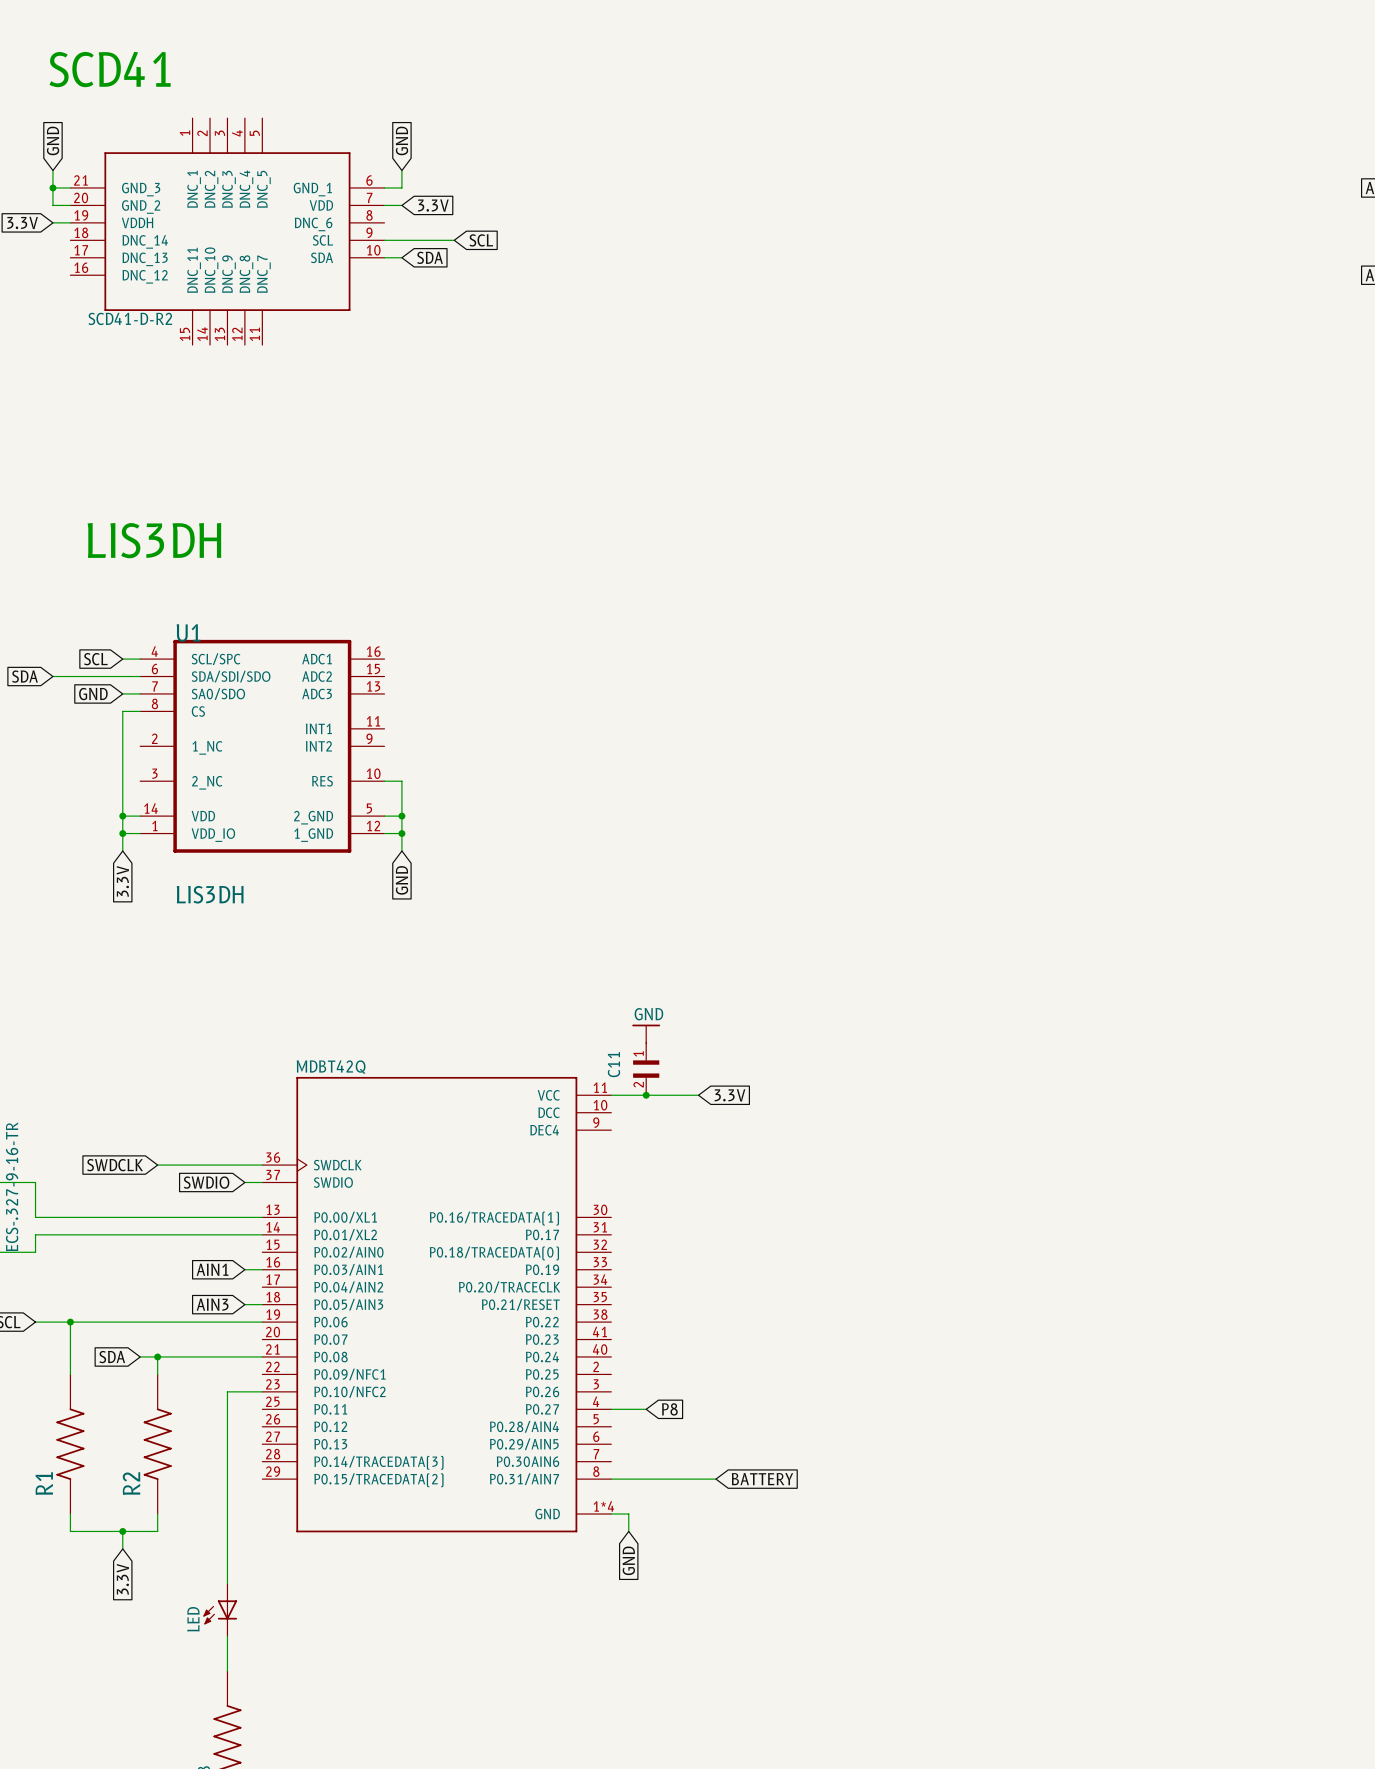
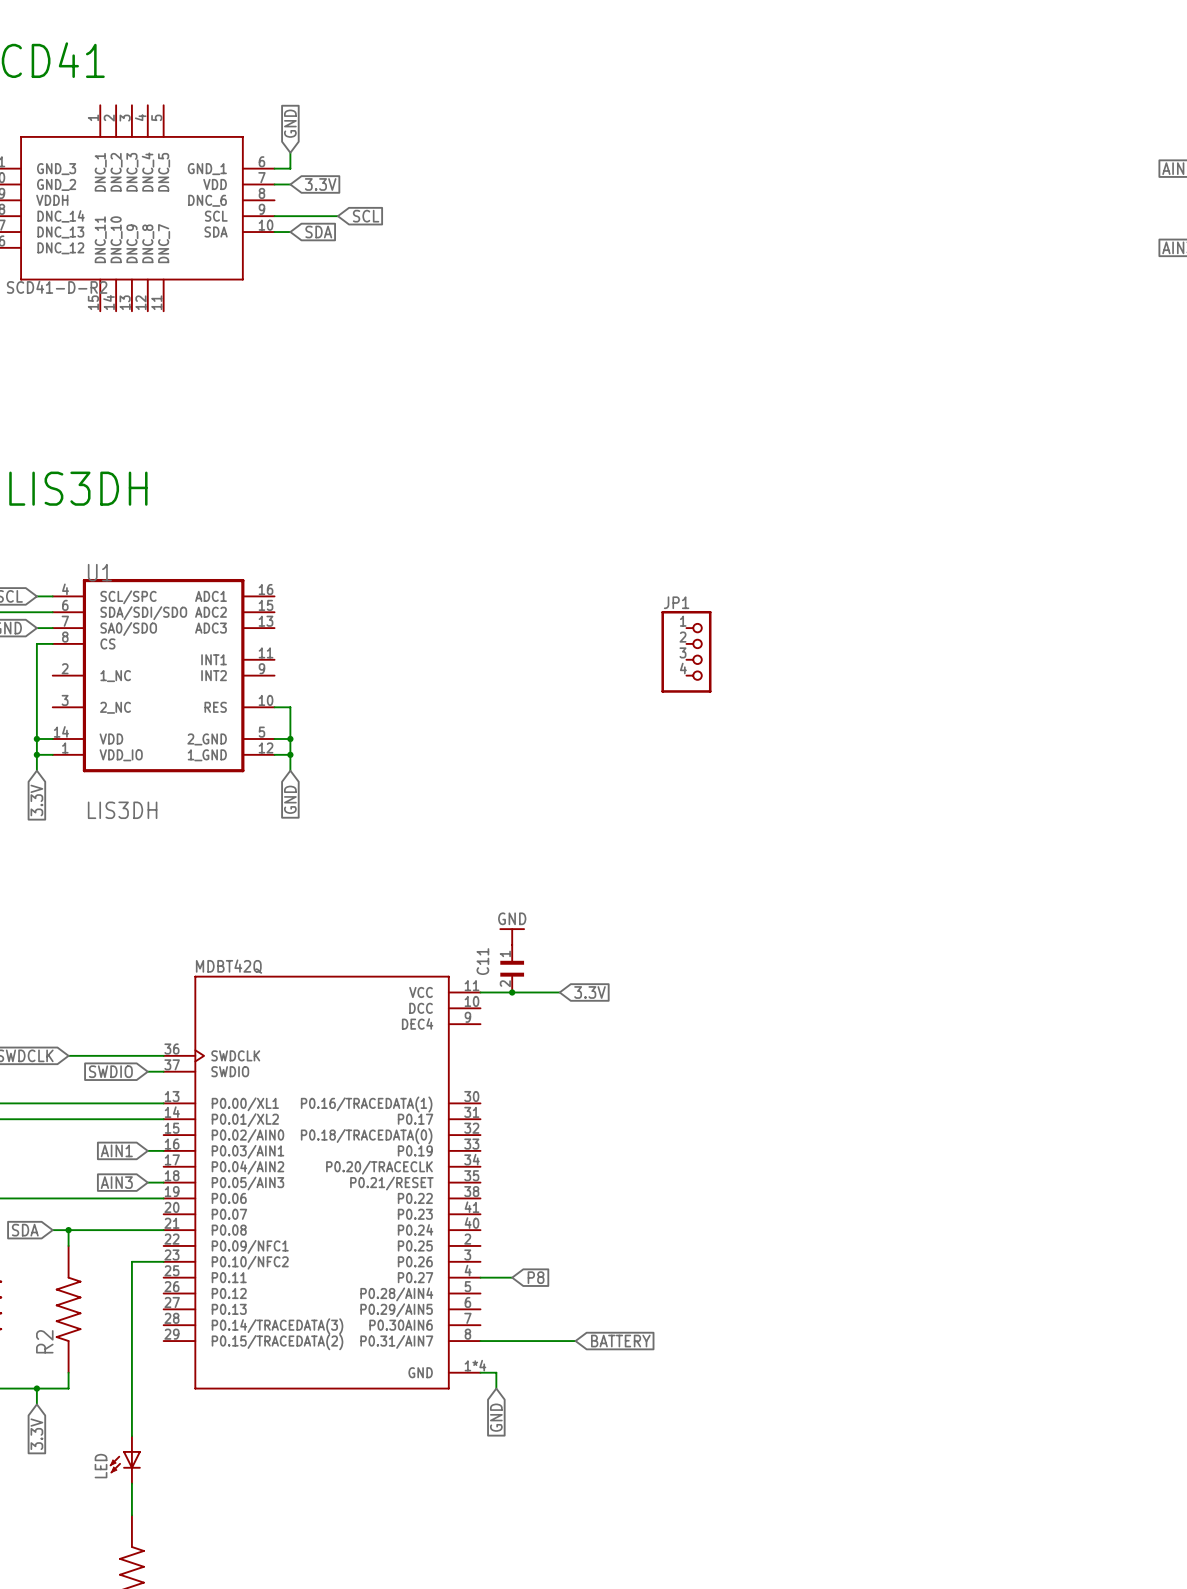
JP1: none -> (686, 651)

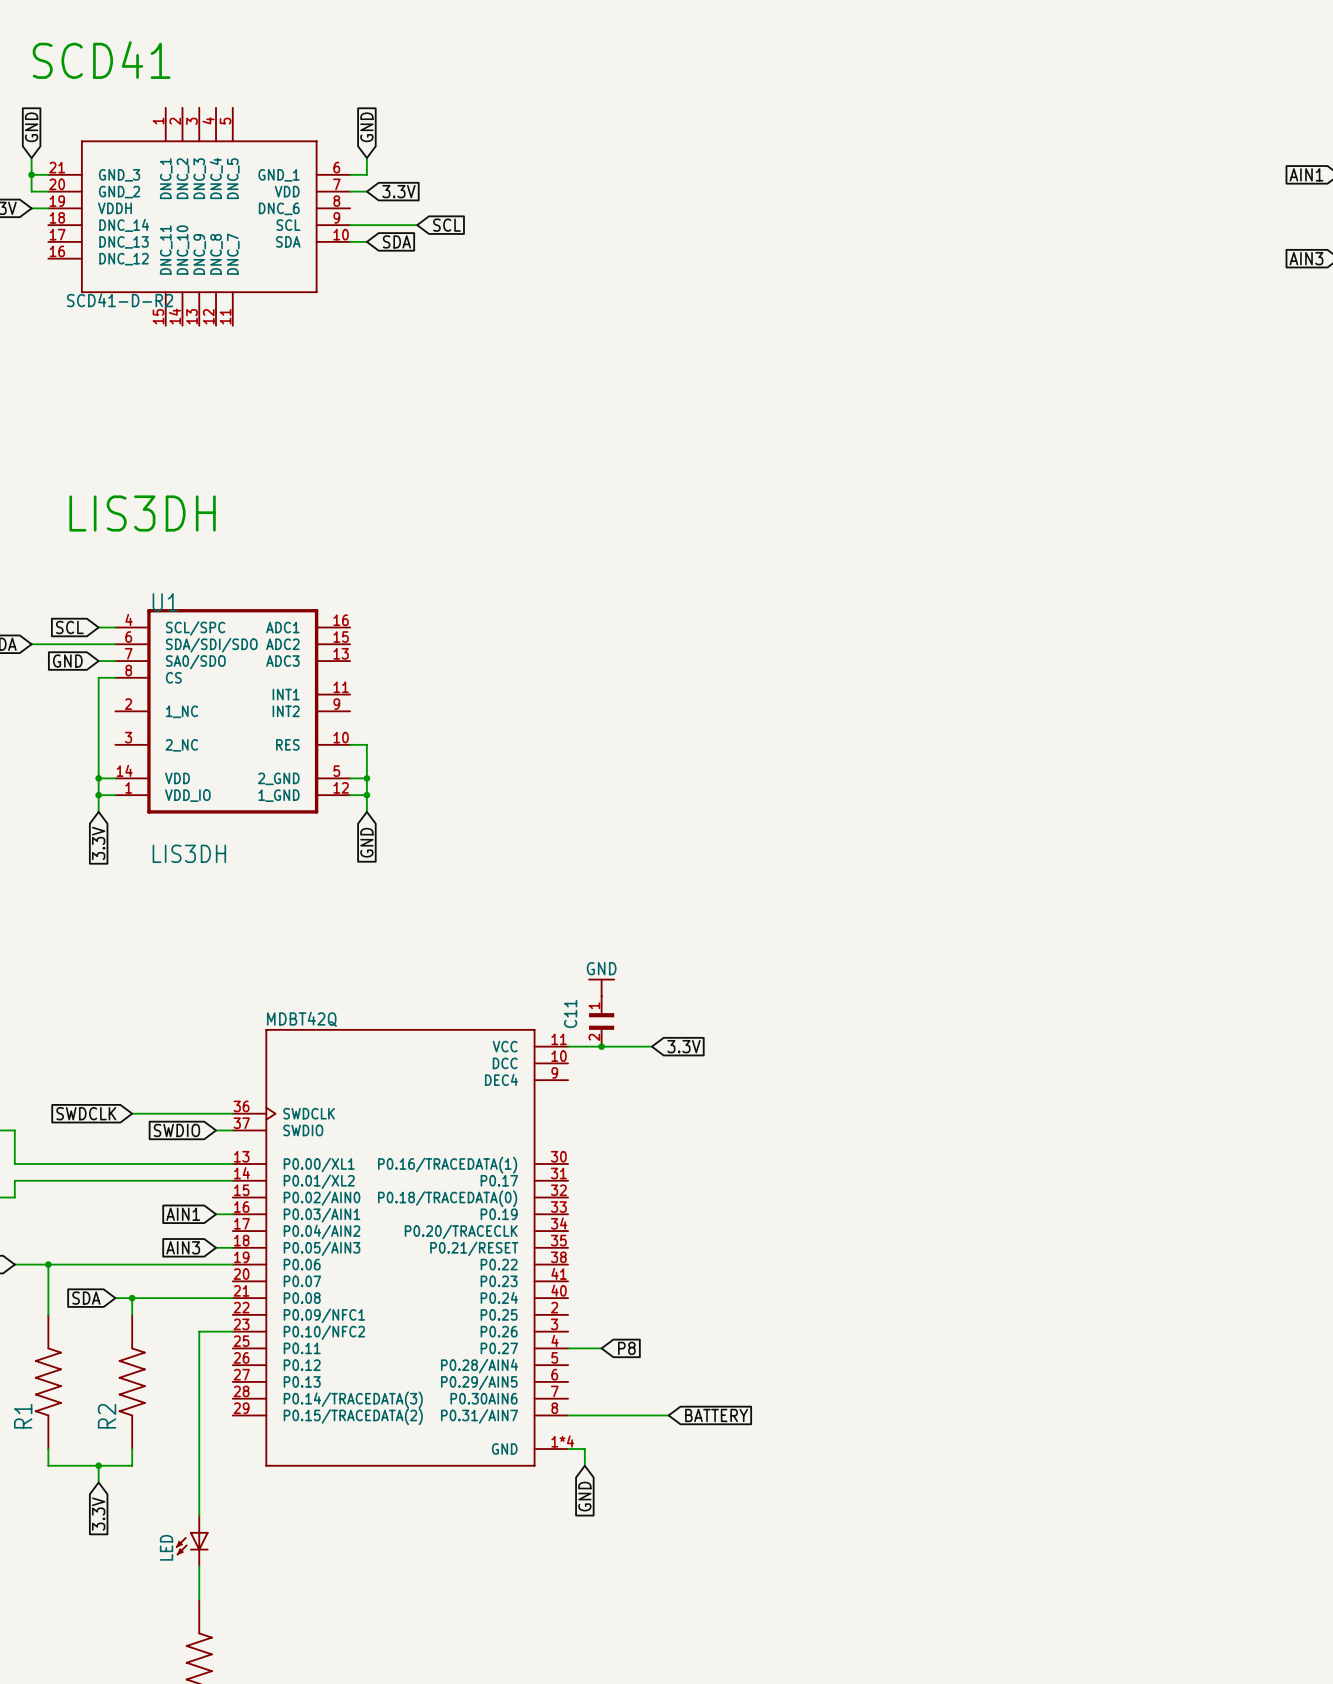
JP1: (686, 651) -> none

